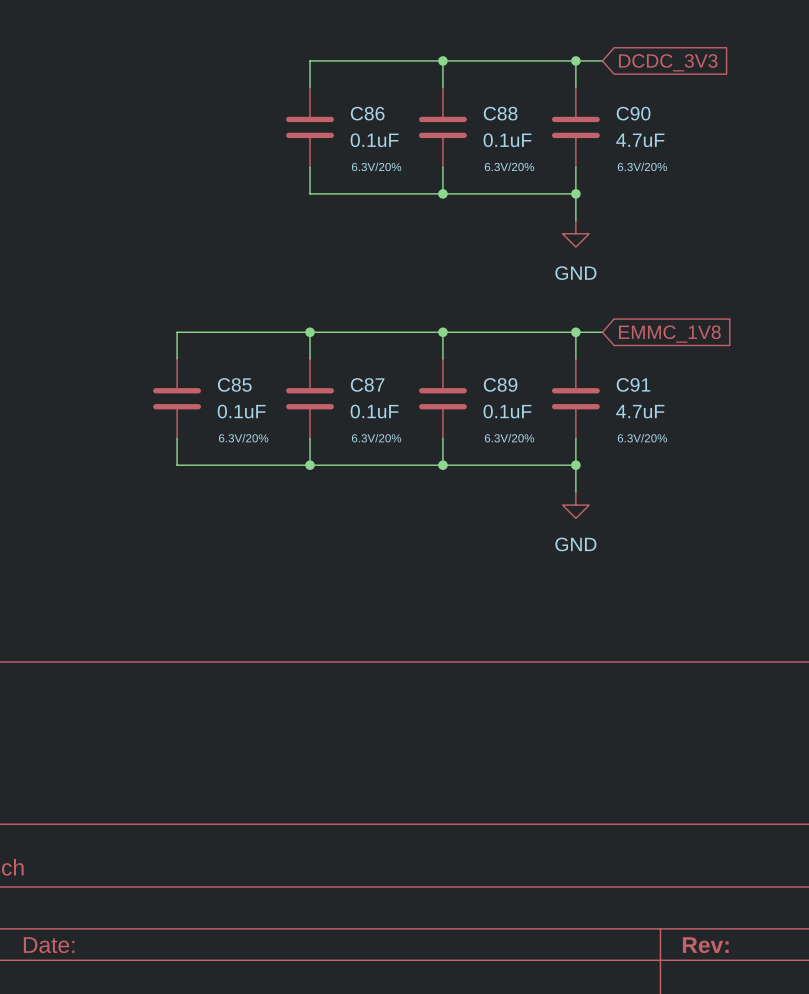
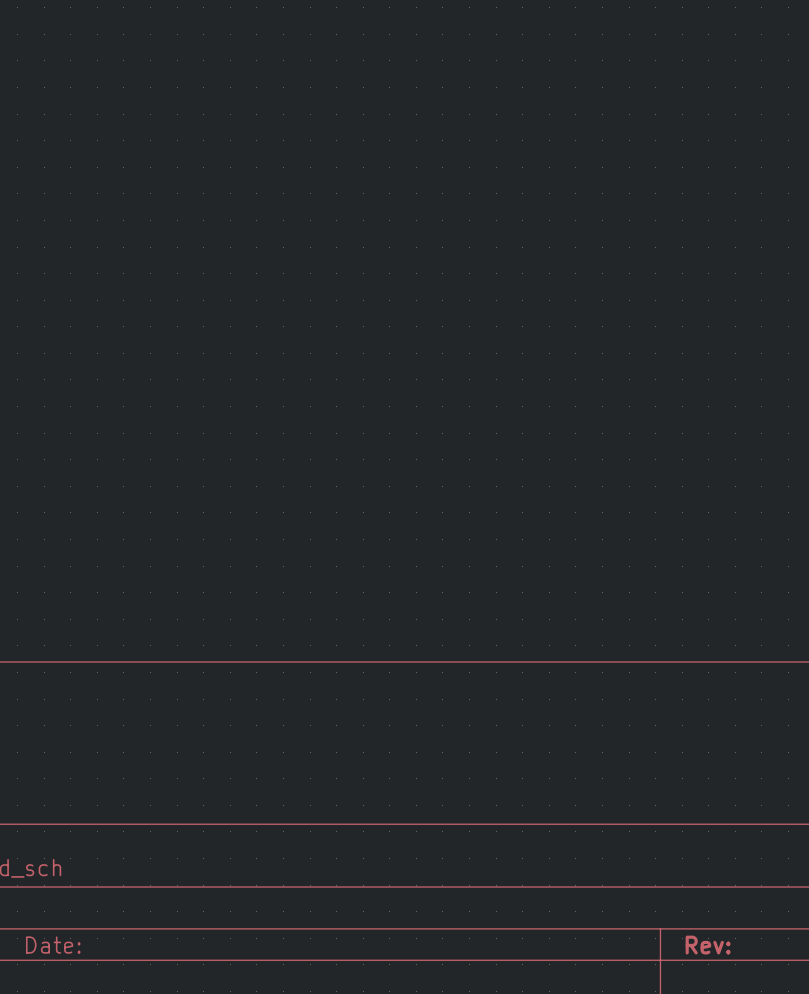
wire: (442, 60) (442, 87) -> none
junction: (442, 60) -> none
wire: (575, 60) (575, 87) -> none
junction: (575, 60) -> none
wire: (602, 60) (310, 60) (310, 87) -> none
global label: DCDC_3V3 (668, 62) -> none
C86: 0.1uF (310, 127) -> none
C88: 0.1uF (442, 127) -> none
C90: 4.7uF (575, 127) -> none
wire: (310, 167) (310, 193) (575, 193) -> none
wire: (442, 167) (442, 193) -> none
wire: (575, 167) (575, 220) -> none
junction: (442, 193) -> none
junction: (575, 193) -> none
power symbol: GND (575, 233) -> none
wire: (310, 332) (310, 358) -> none
junction: (310, 332) -> none
wire: (442, 332) (442, 358) -> none
junction: (442, 332) -> none
wire: (575, 332) (575, 358) -> none
junction: (575, 332) -> none
wire: (602, 332) (177, 332) (177, 358) -> none
global label: EMMC_1V8 (669, 334) -> none
C85: 0.1uF (177, 398) -> none
C87: 0.1uF (310, 398) -> none
C89: 0.1uF (442, 398) -> none
C91: 4.7uF (575, 398) -> none
wire: (177, 438) (177, 465) (575, 465) -> none
wire: (310, 438) (310, 465) -> none
wire: (442, 438) (442, 465) -> none
wire: (575, 438) (575, 491) -> none
junction: (310, 465) -> none
junction: (442, 465) -> none
junction: (575, 465) -> none
power symbol: GND (575, 505) -> none

